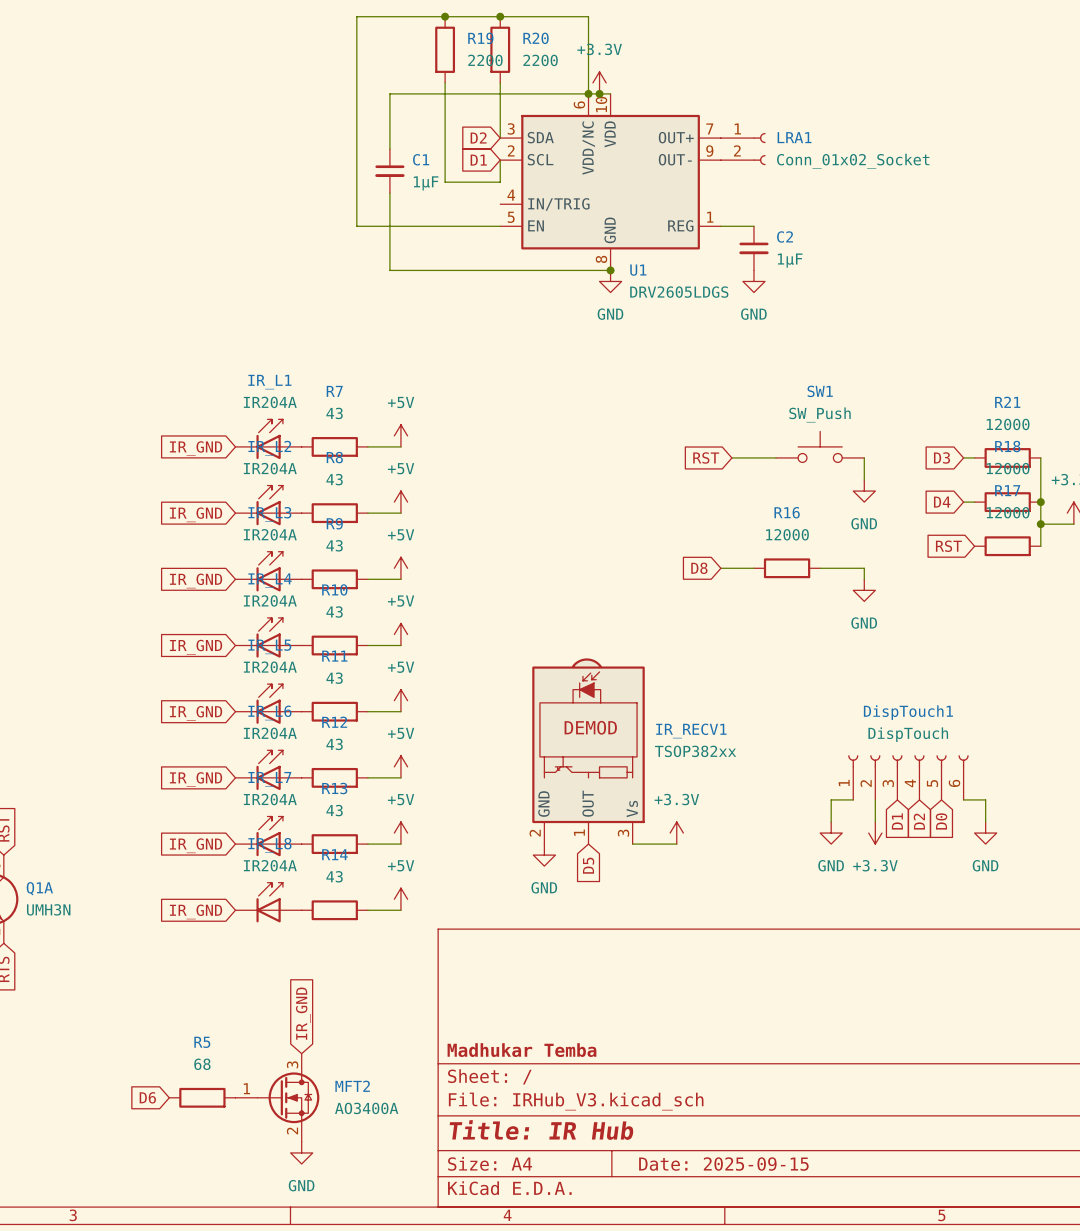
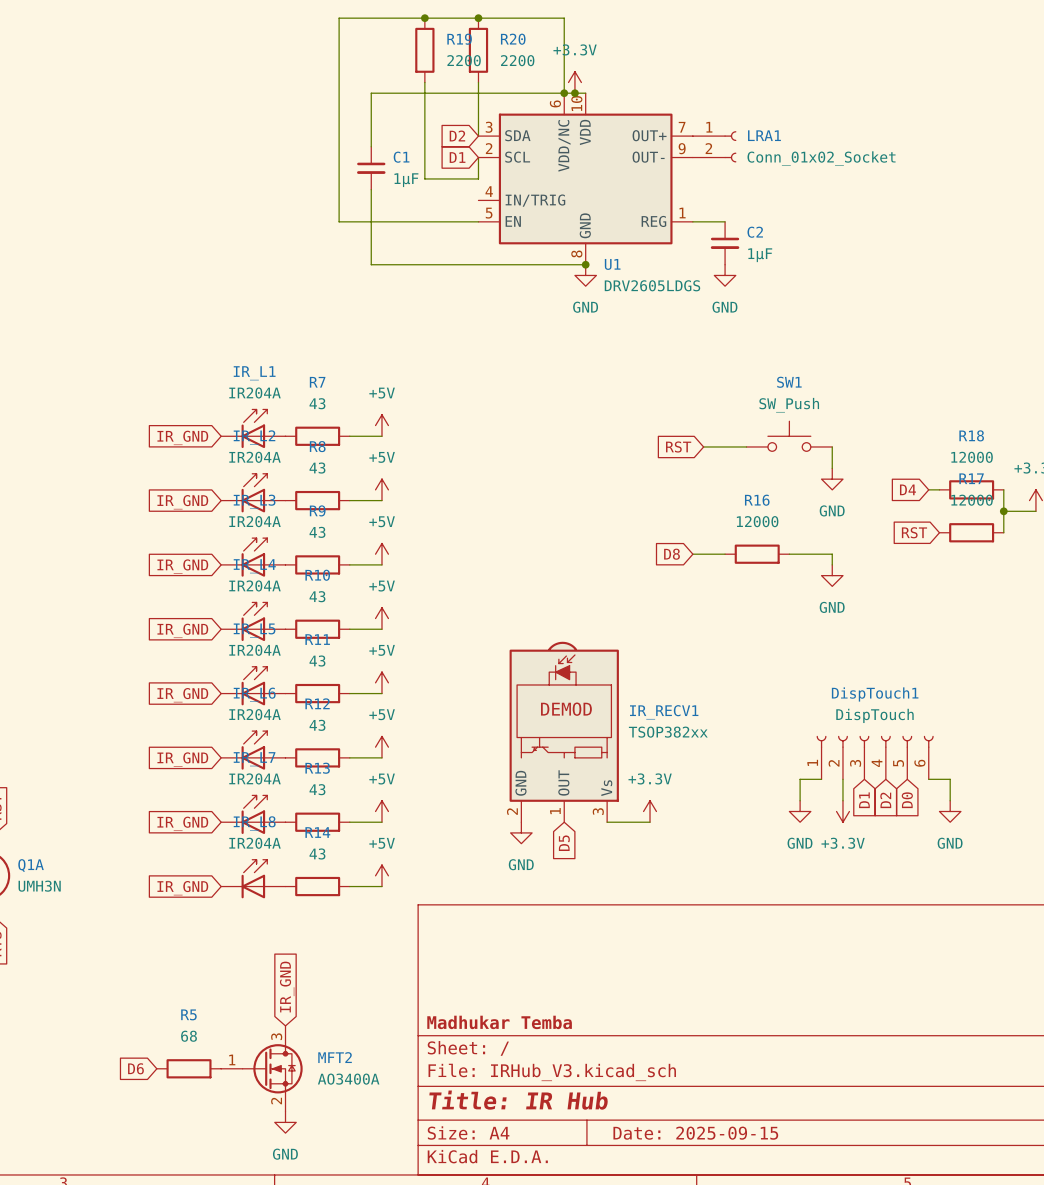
global label: D3 (942, 457) -> none
wire: (963, 457) (974, 457) -> none
R21: 12000 (1007, 457) -> none
wire: (1040, 457) (1040, 502) -> none
junction: (1040, 502) -> none

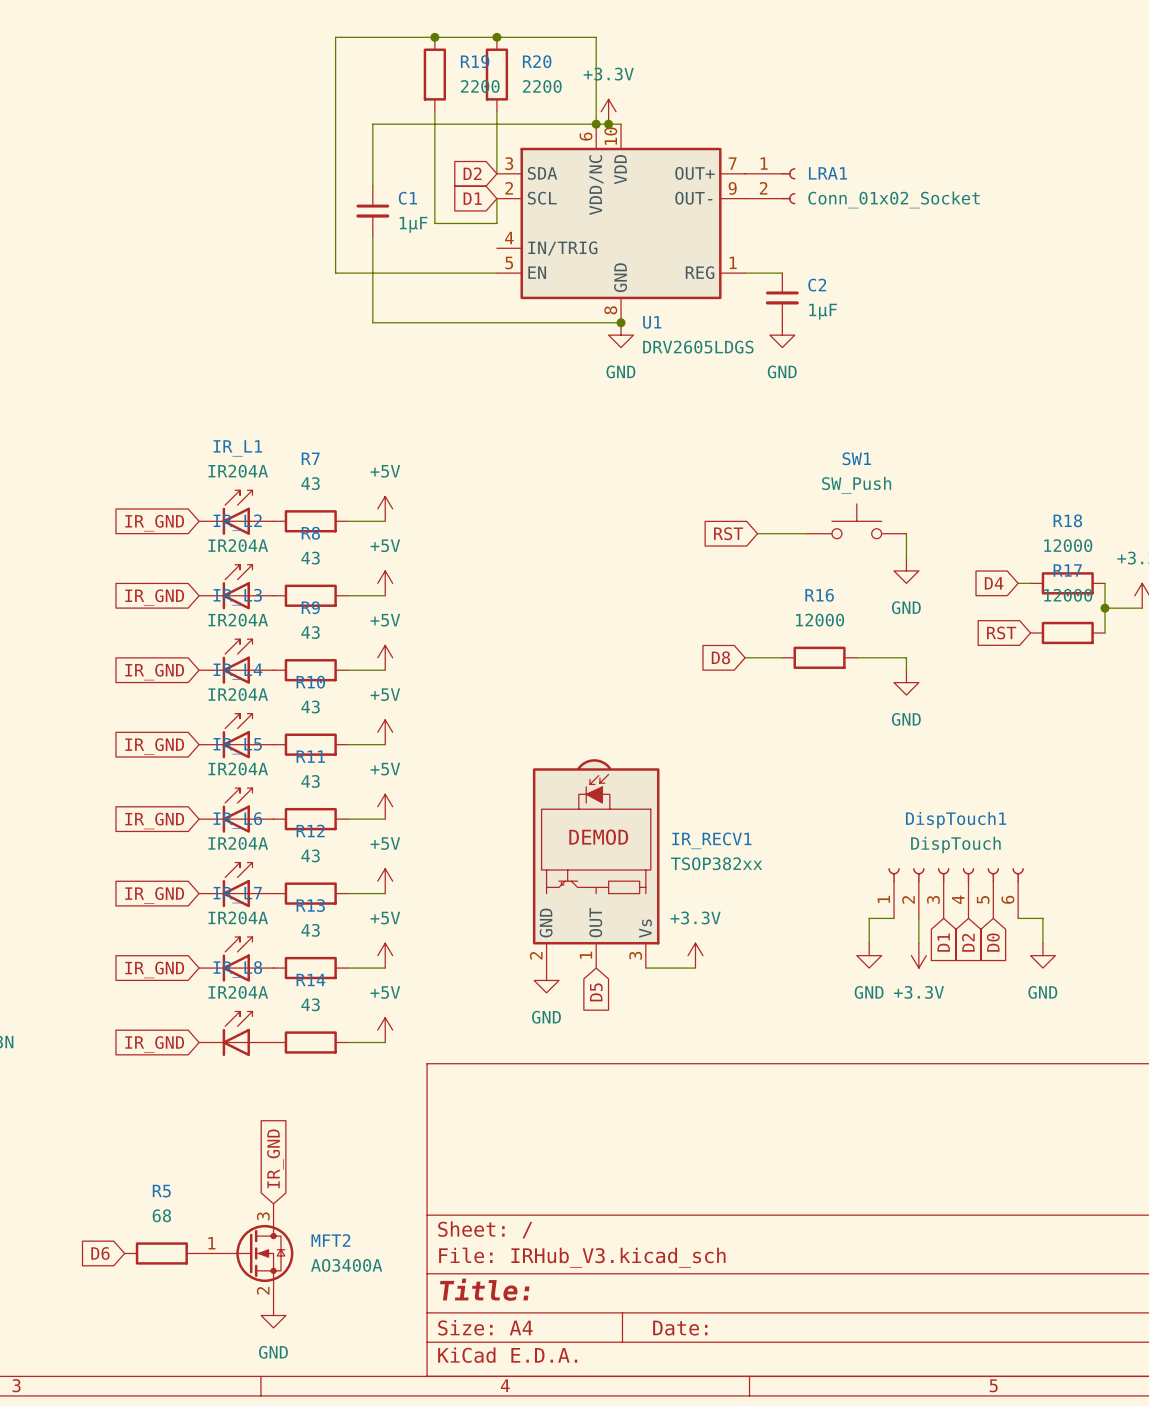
title block: Madhukar Temba (499, 1022) -> none
title block: Title: IR Hub (518, 1100) -> Title: (484, 1289)
title block: Date: 2025-09-15 (695, 1133) -> Date: (680, 1328)

